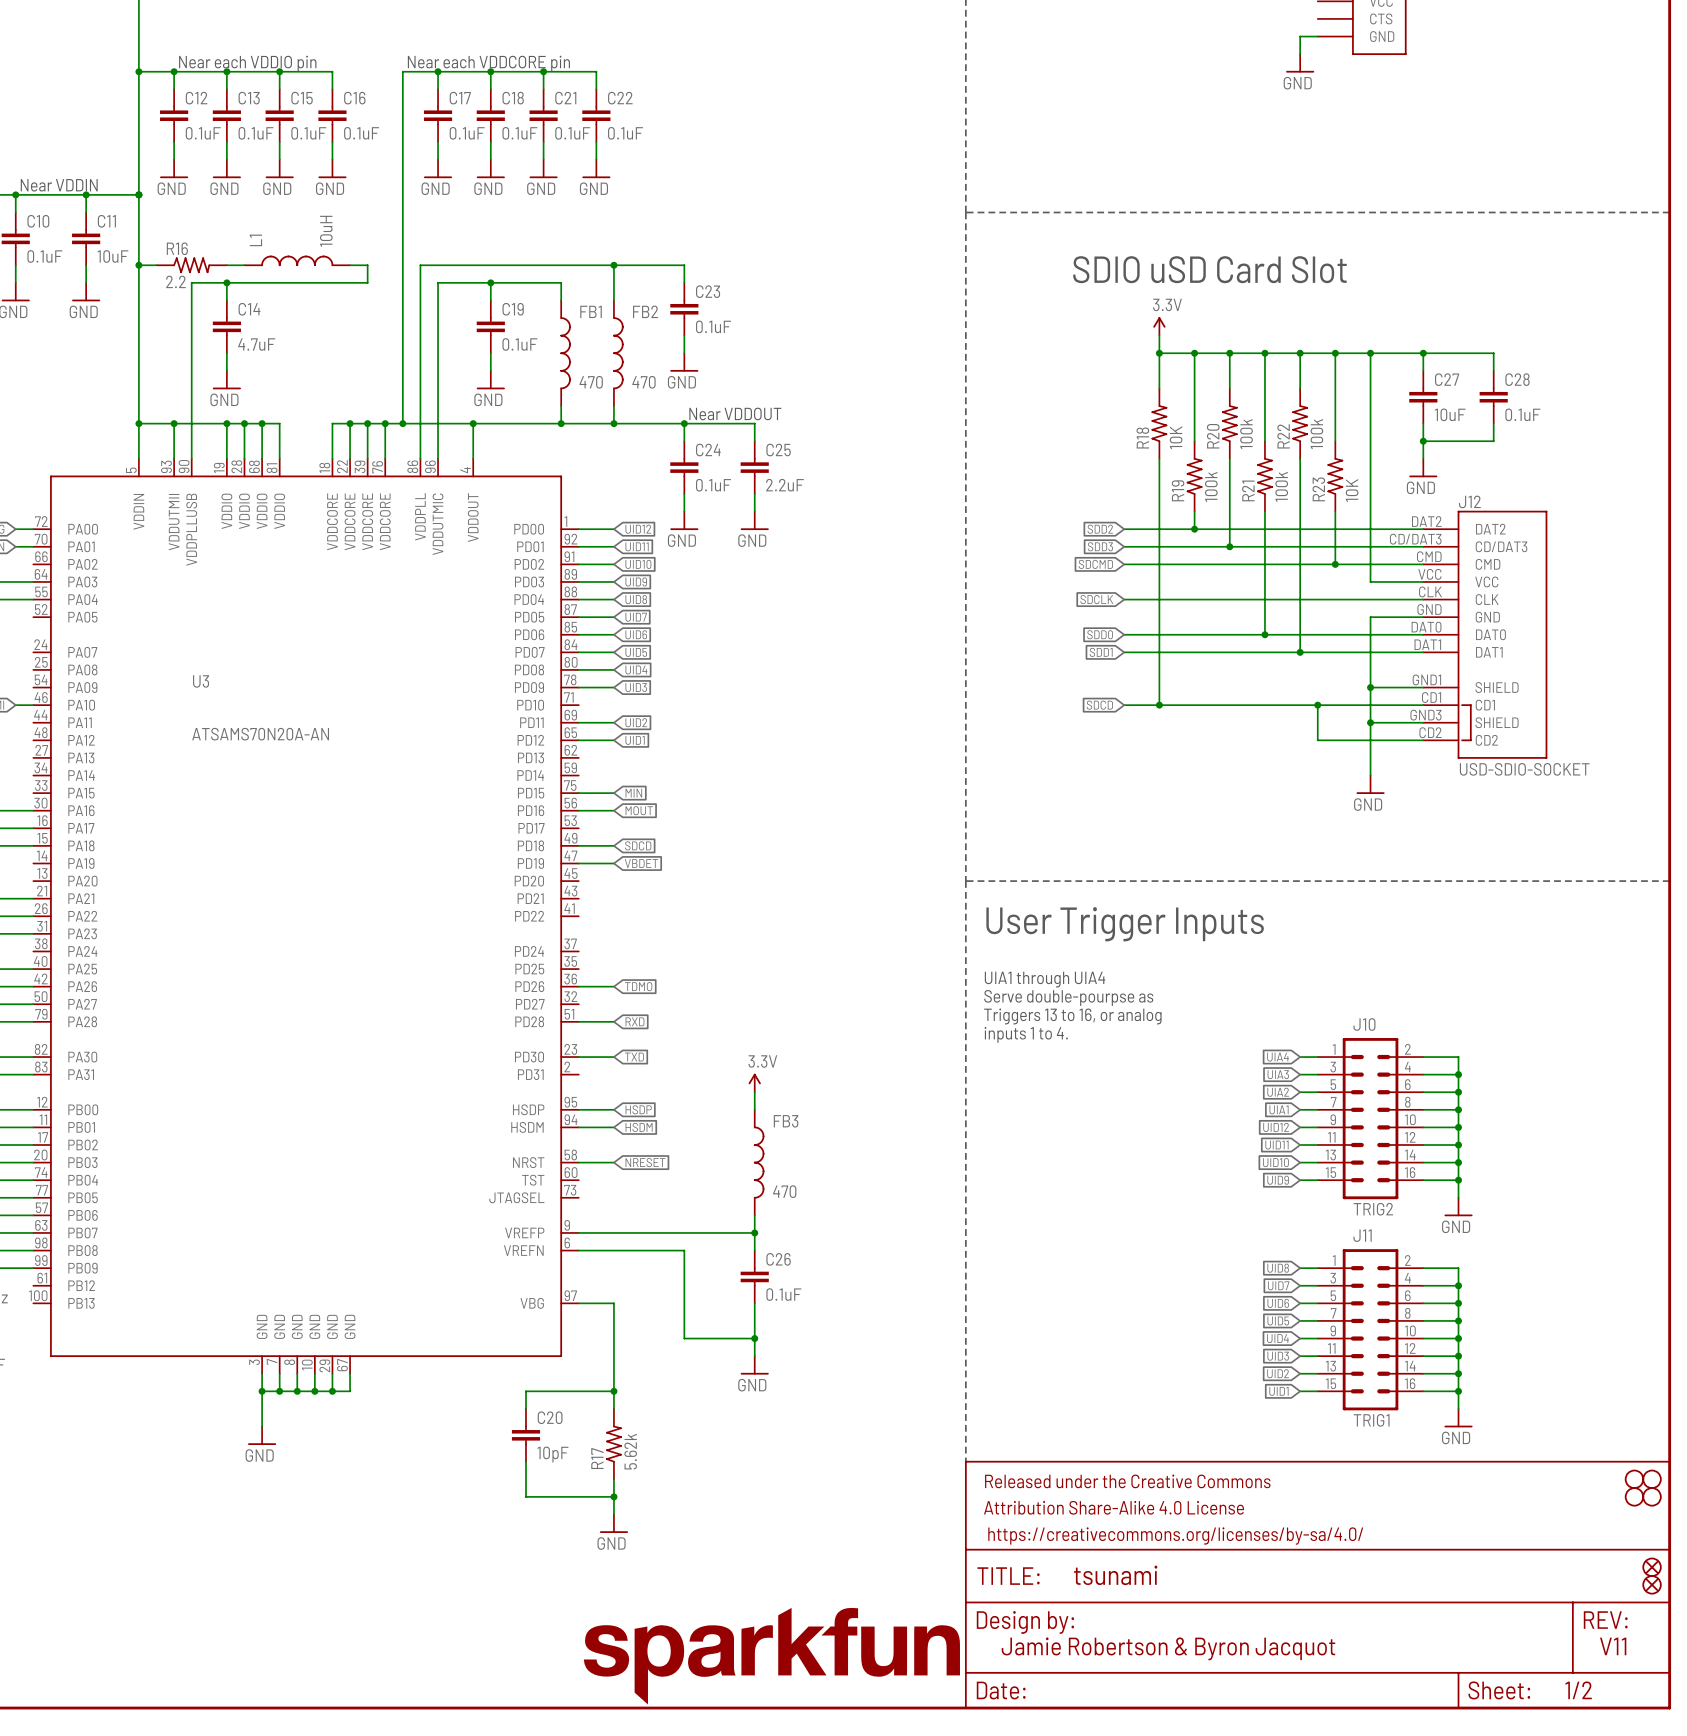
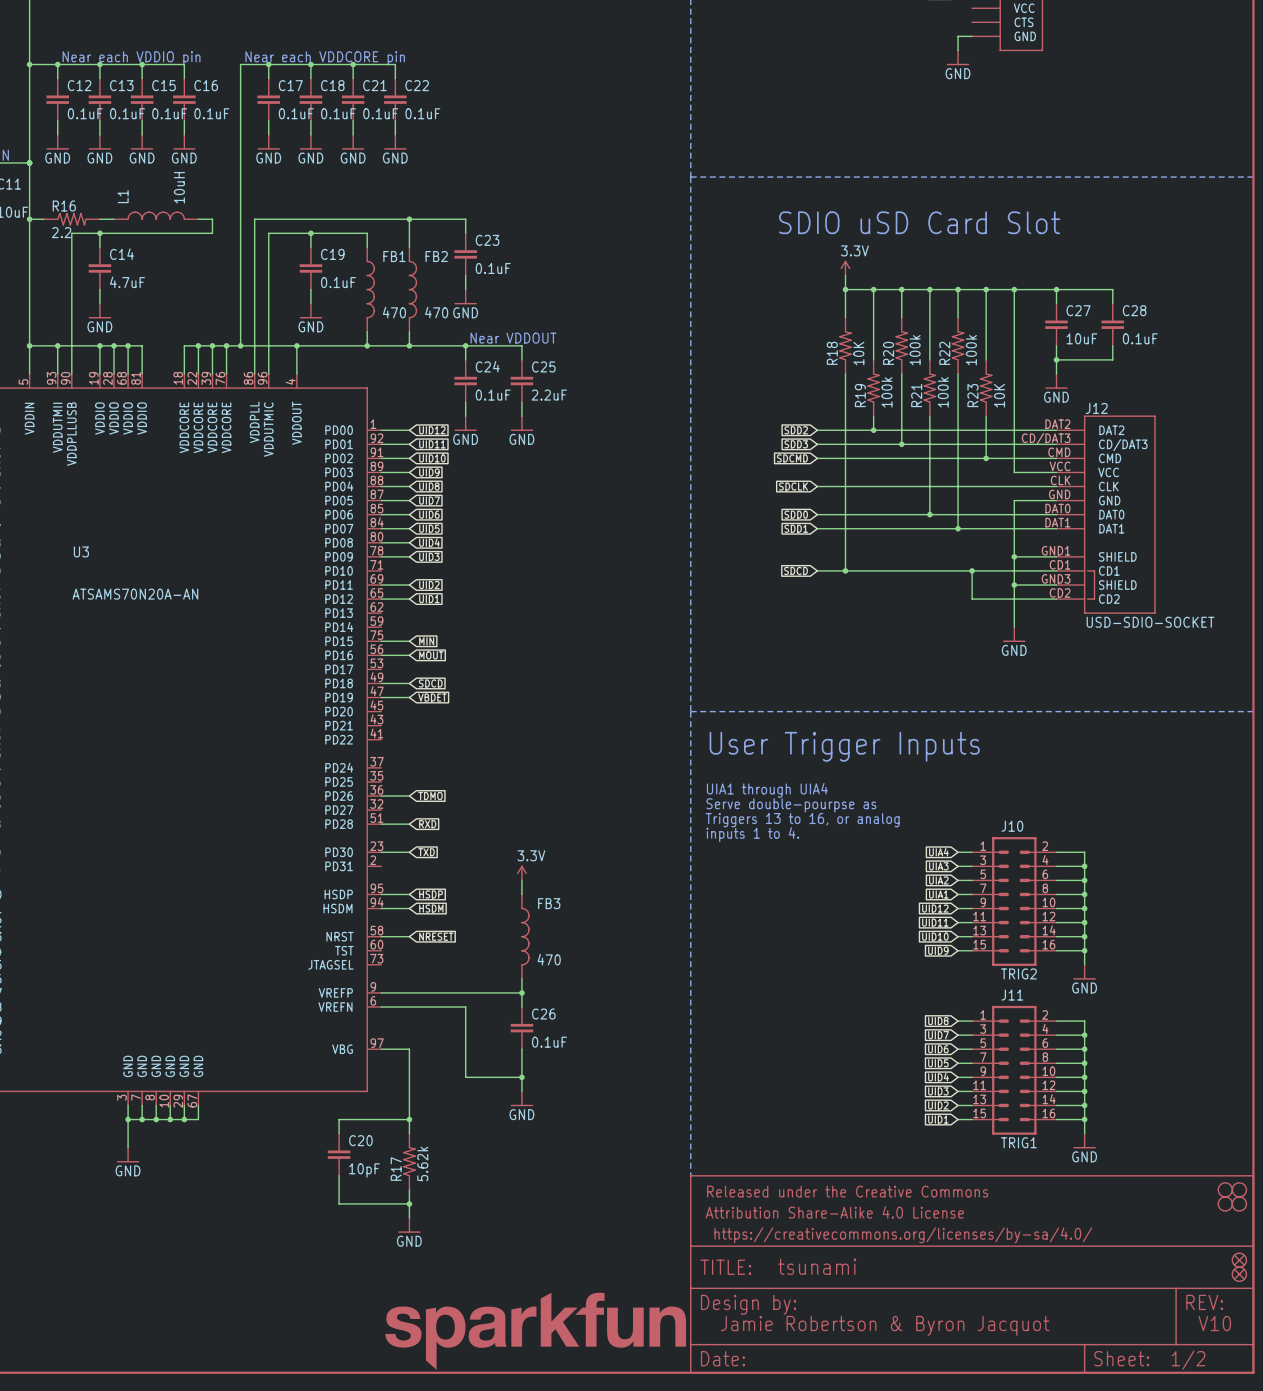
text: V11 (1613, 1646) -> V10 (1214, 1323)

